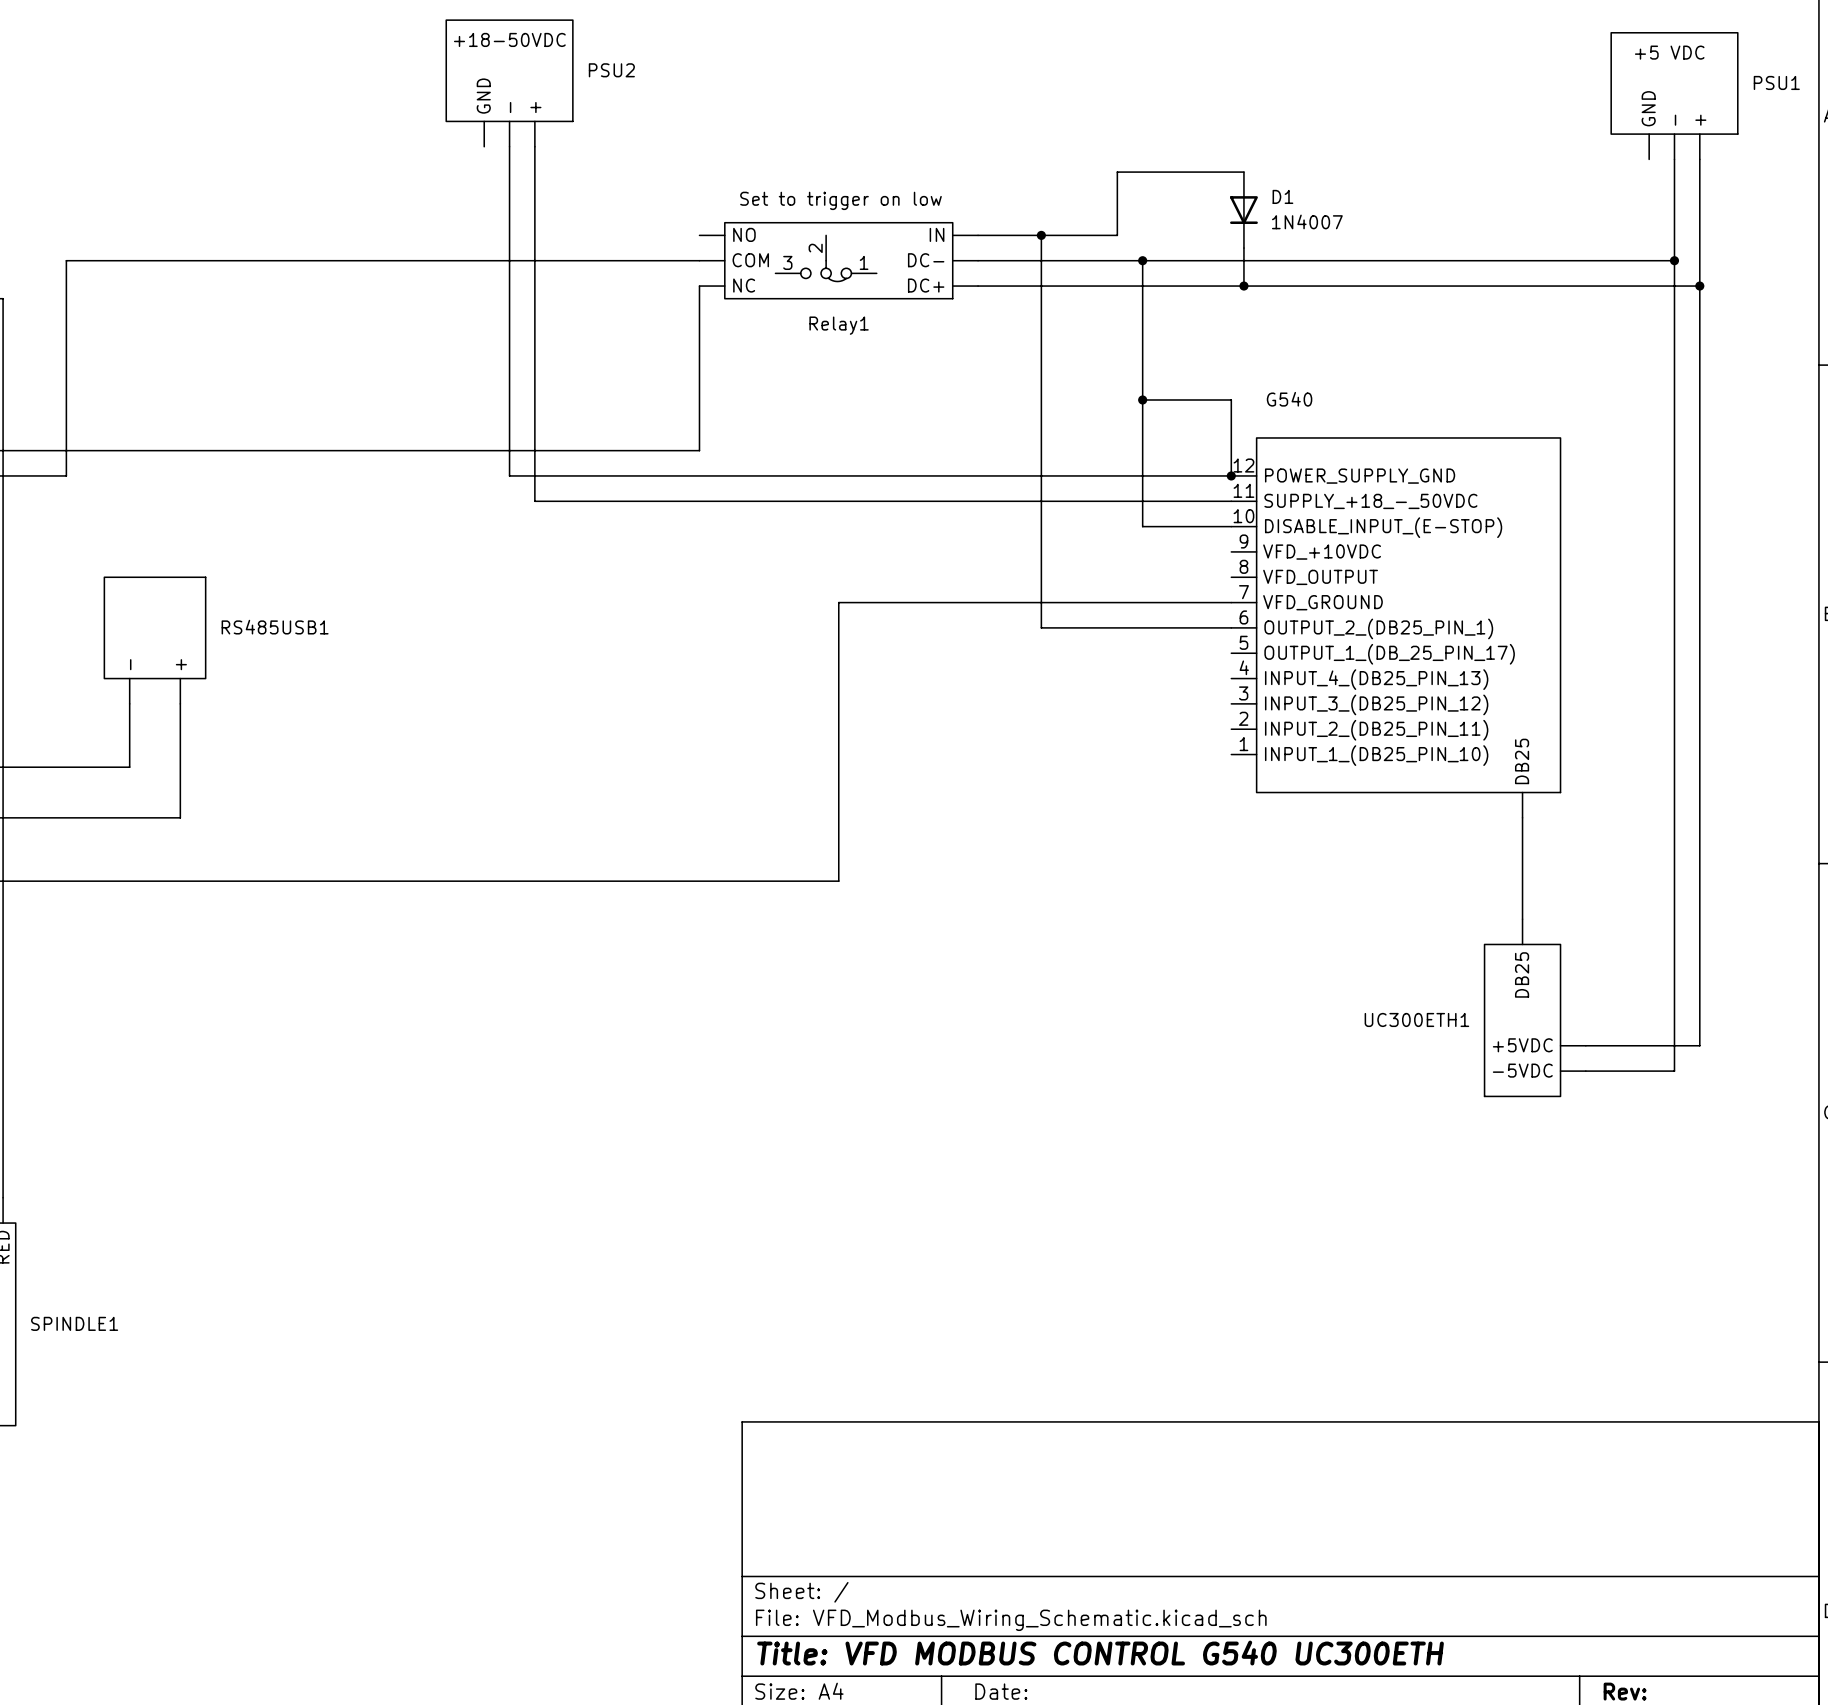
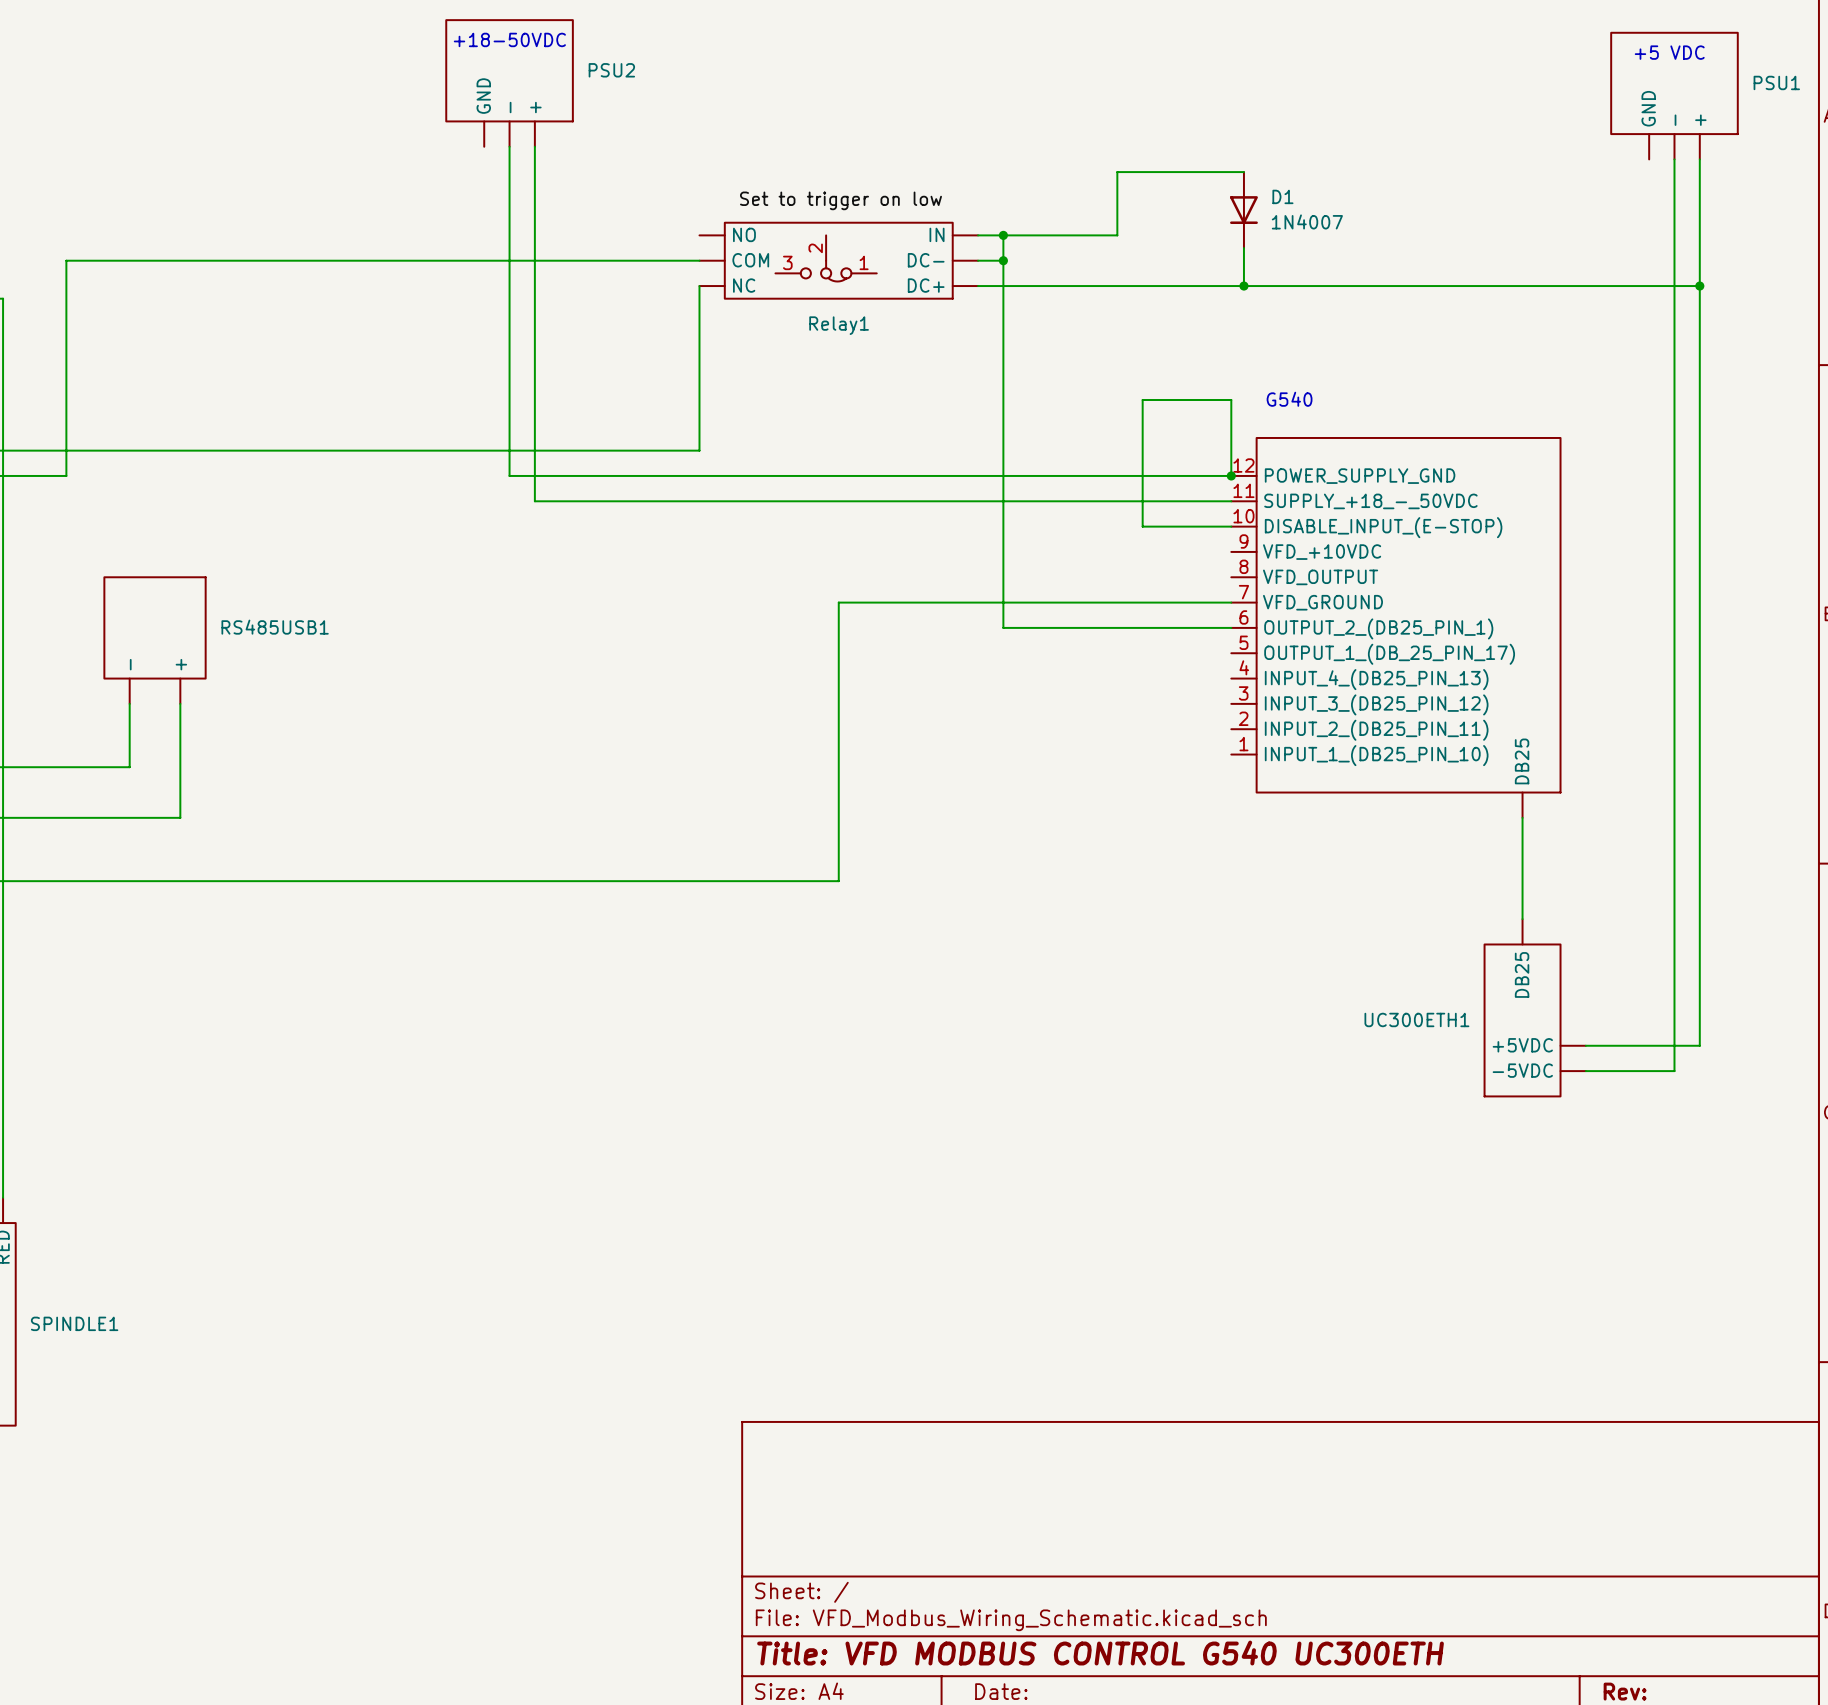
junction: none -> (1003, 235)
wire: (1041, 235) (1041, 627) -> (1003, 235) (1003, 627) (1041, 627)
junction: (1041, 235) -> none
wire: (1003, 260) (1674, 260) -> none
junction: none -> (1003, 260)
wire: (1142, 260) (1142, 399) -> none
junction: (1142, 260) -> none
junction: (1674, 260) -> none
junction: (1142, 399) -> none

